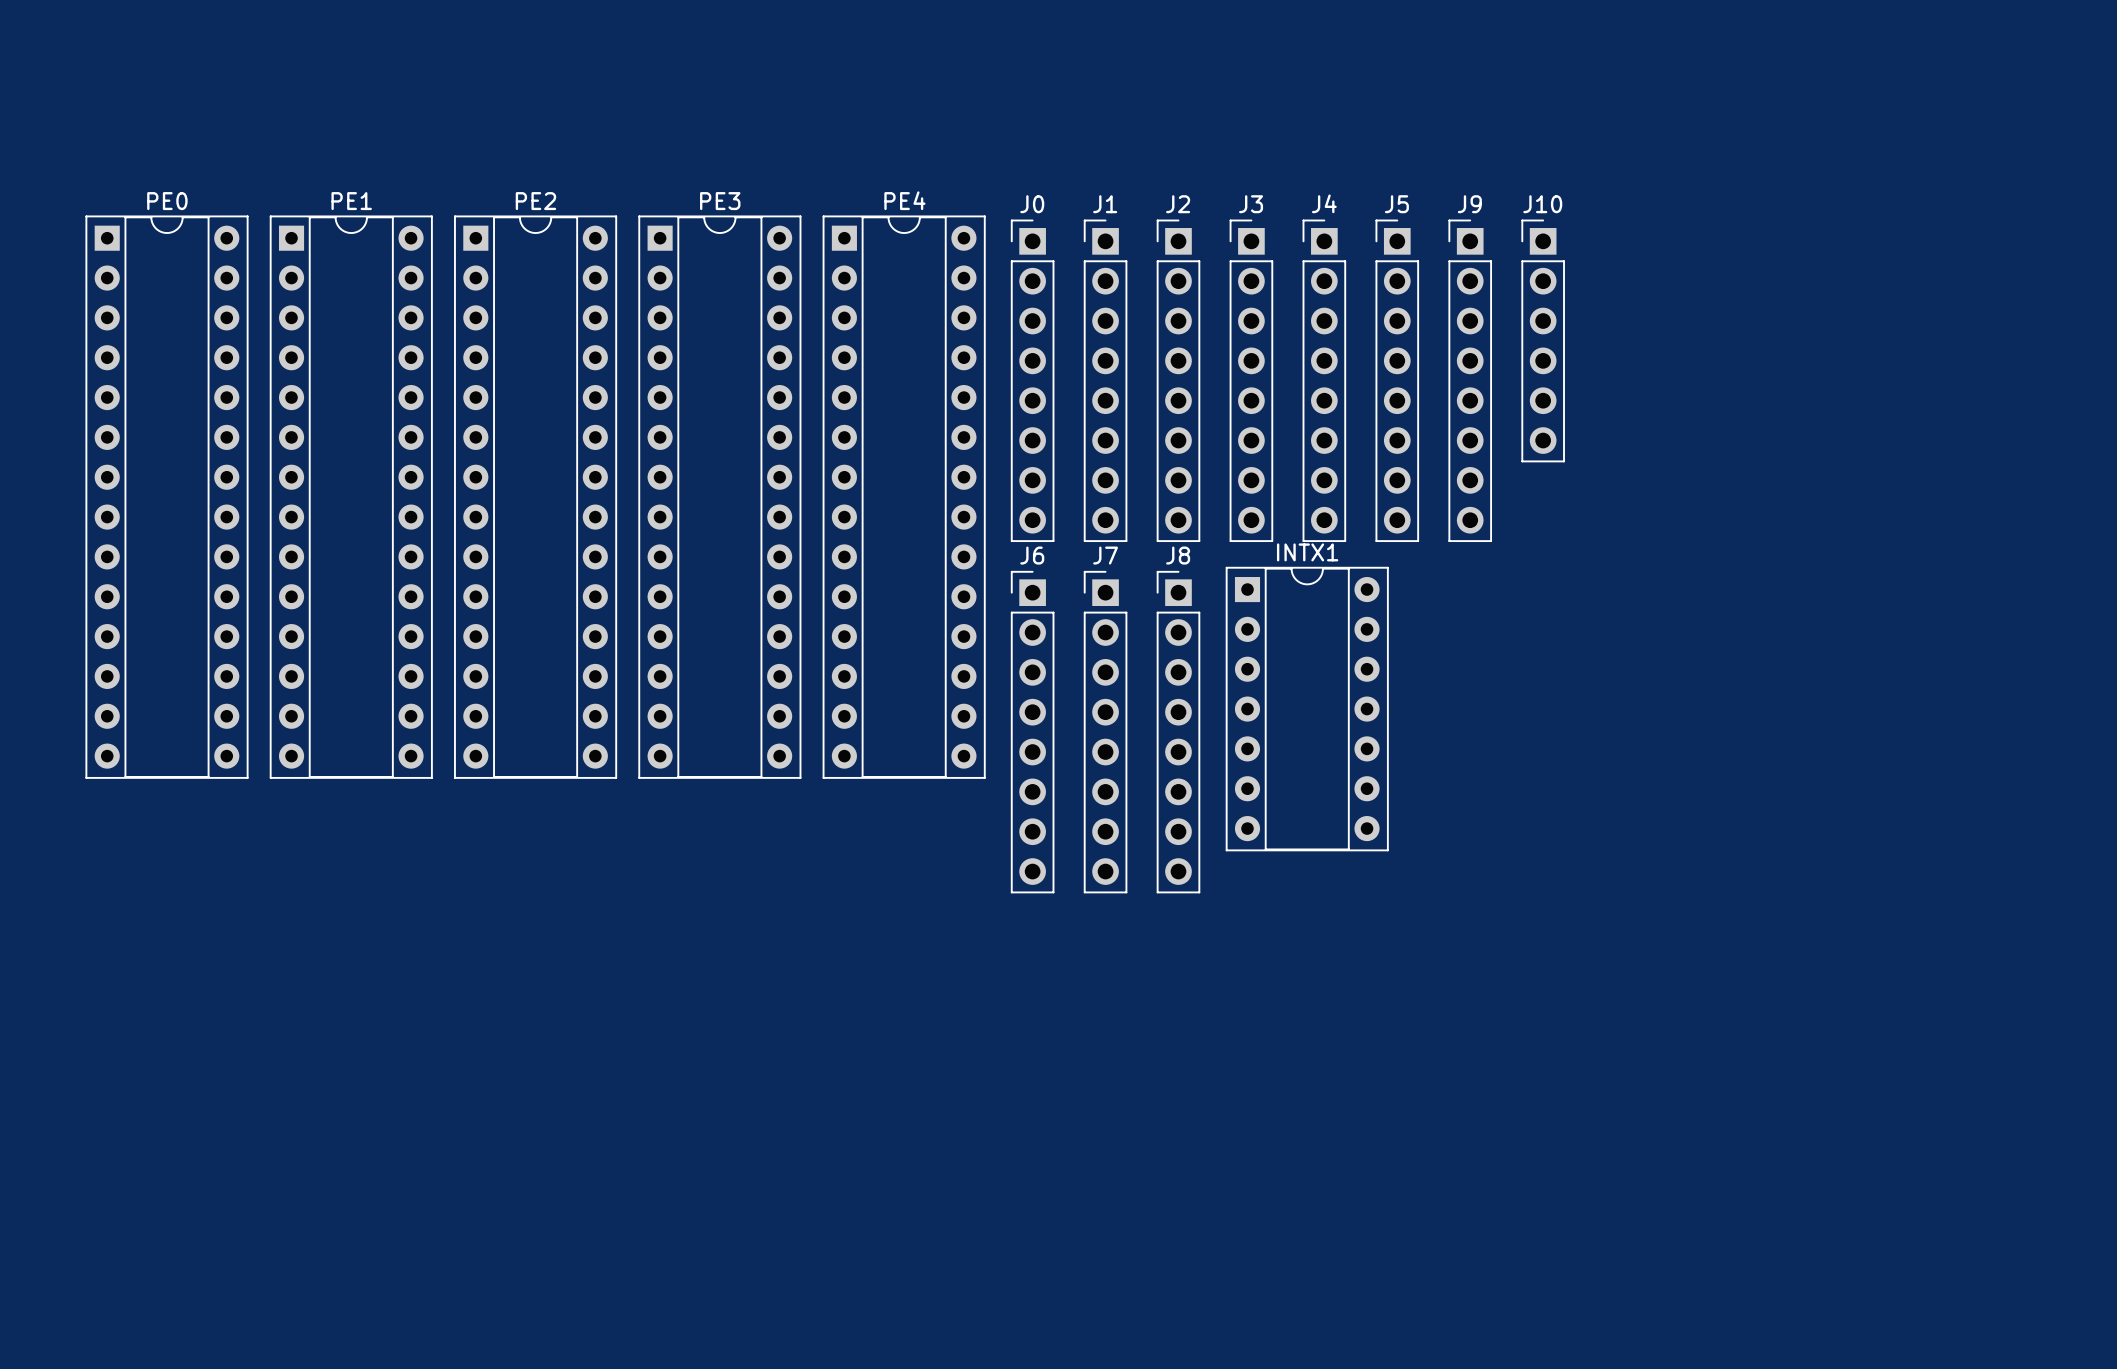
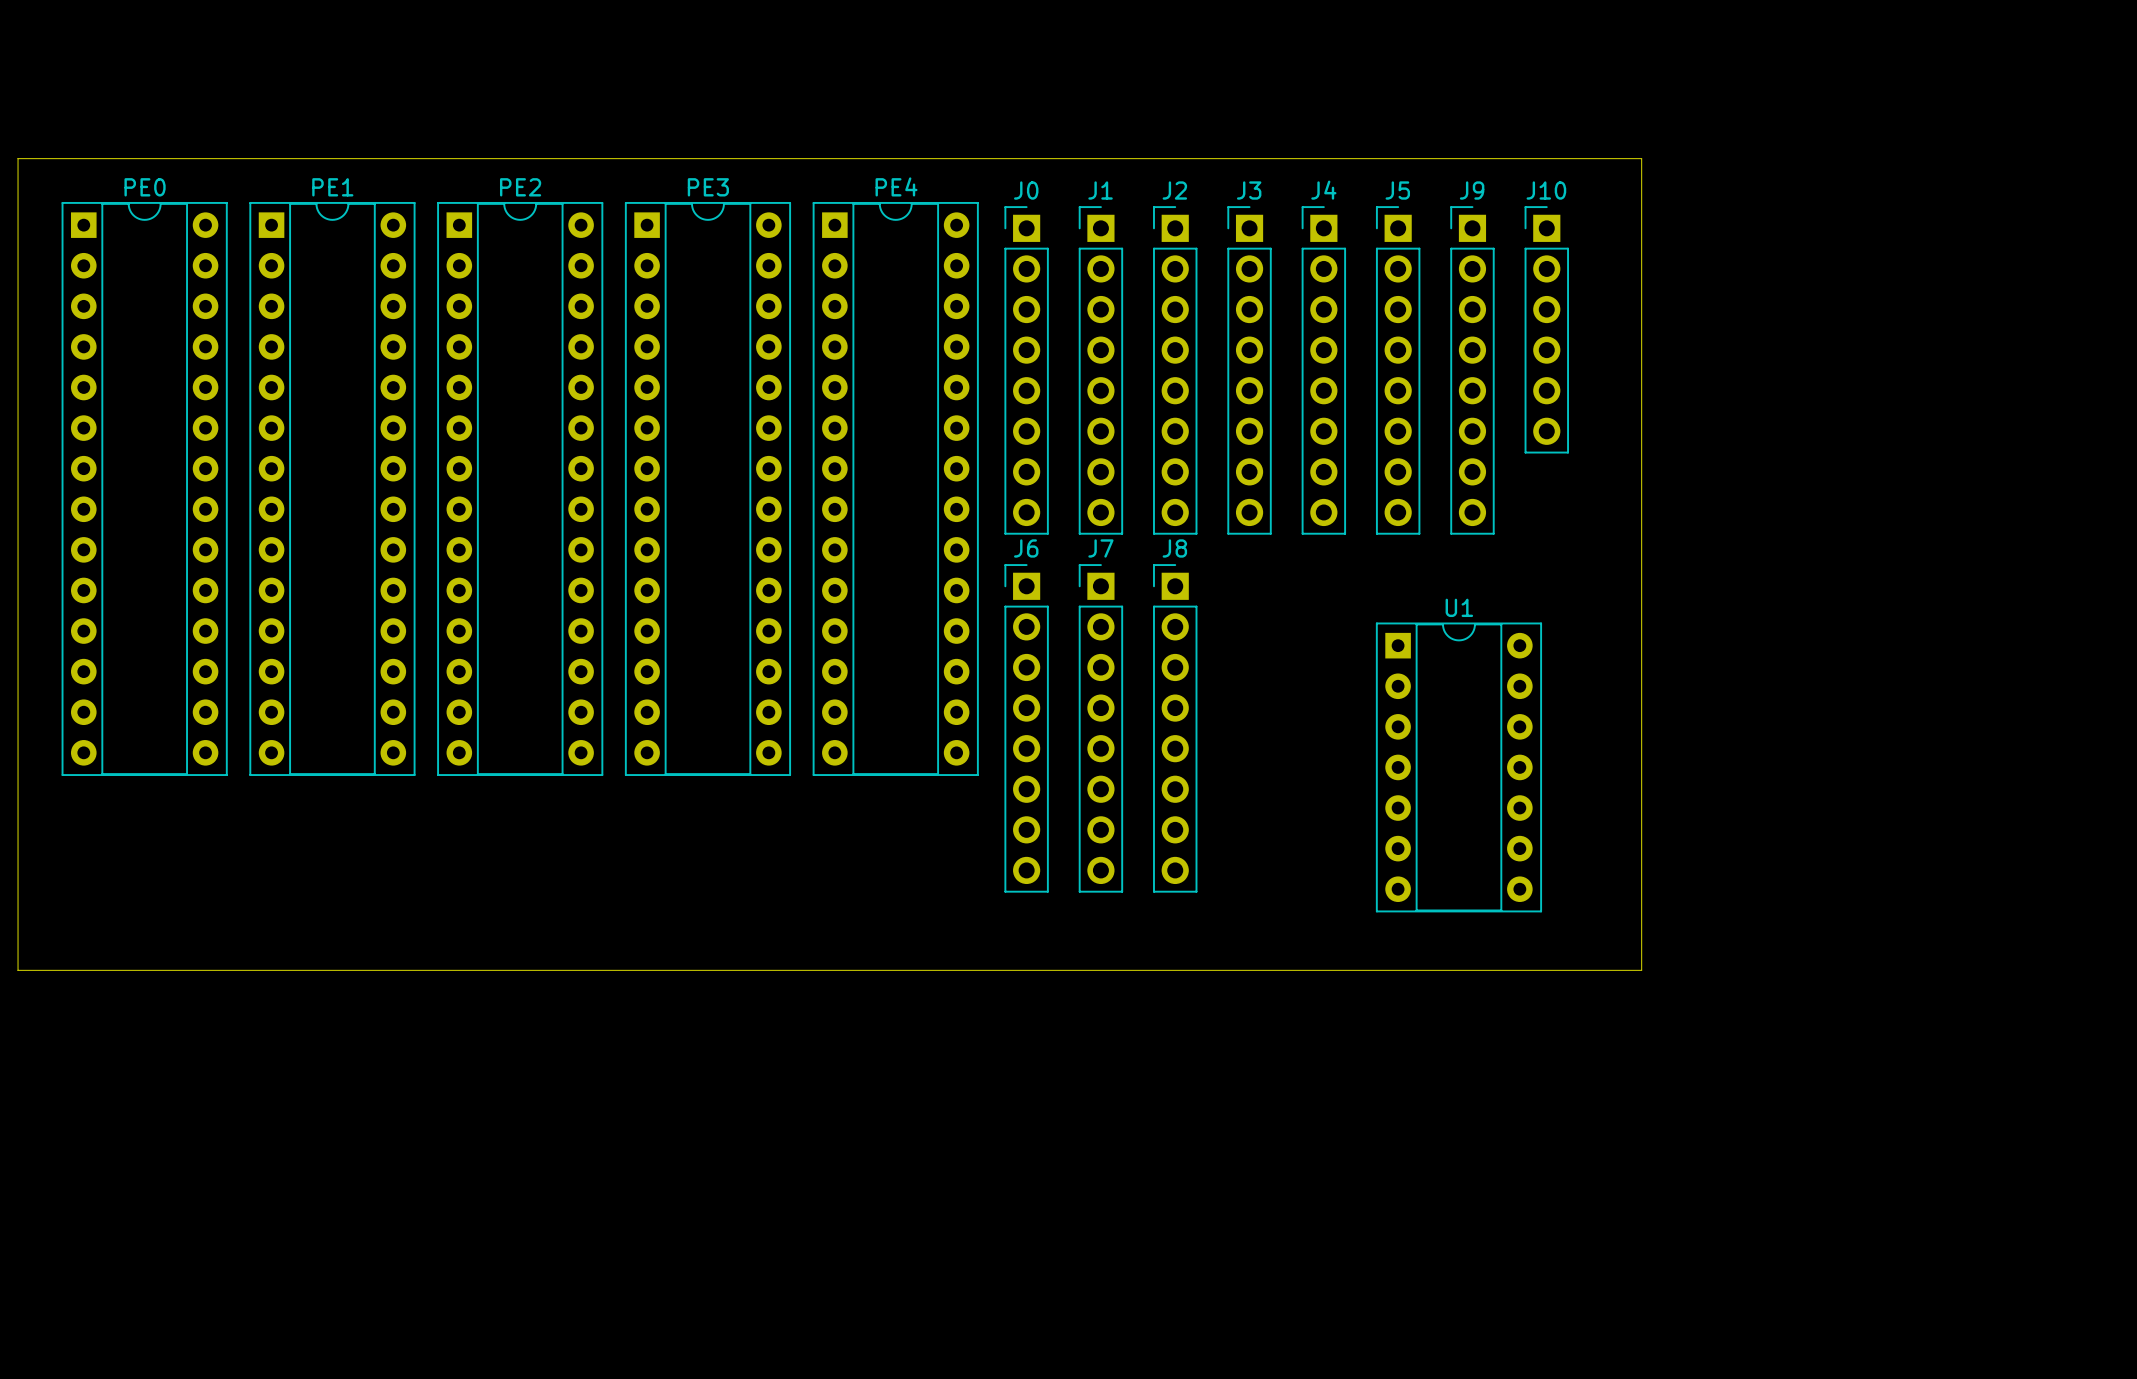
board edge: none -> (18, 158) (1641, 158) (1641, 970) (18, 970) (18, 158)
INTX1: (1307, 709) -> none
U1: none -> (1458, 767)

